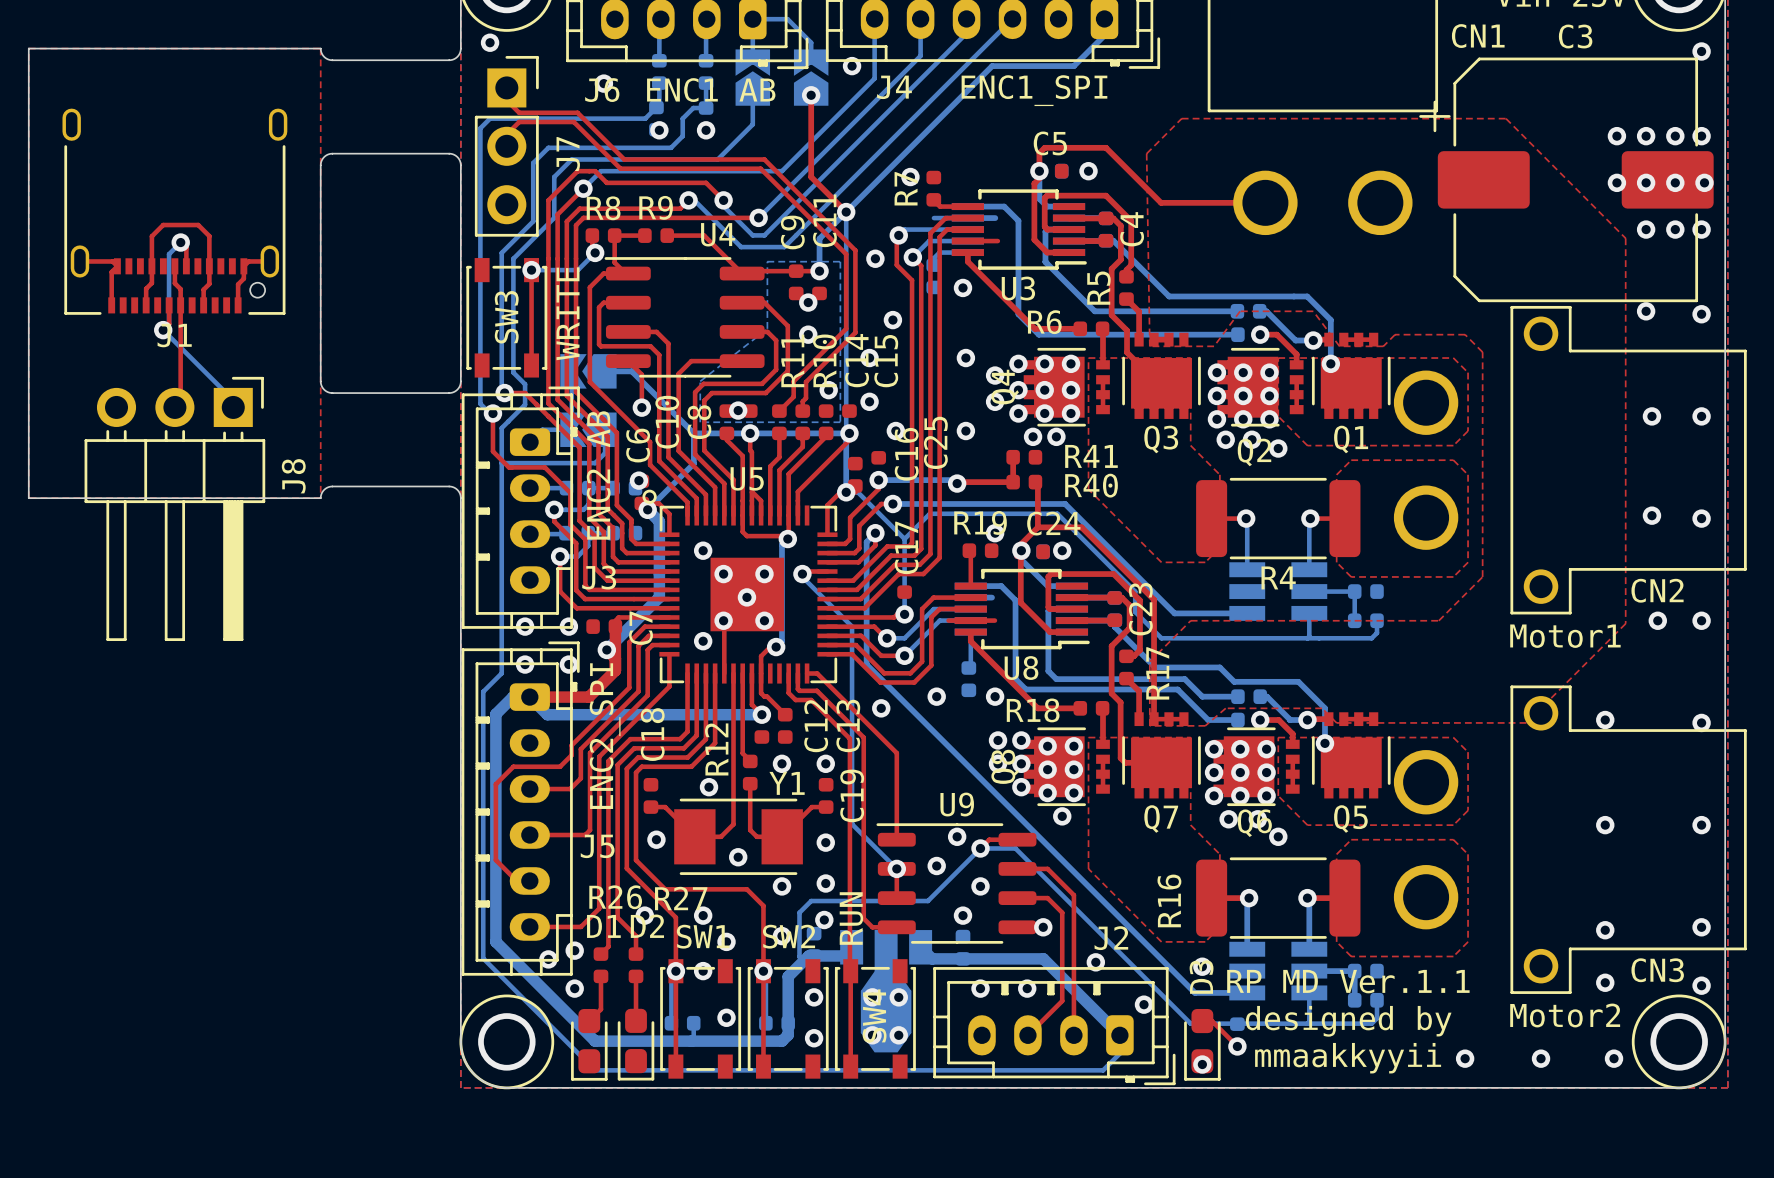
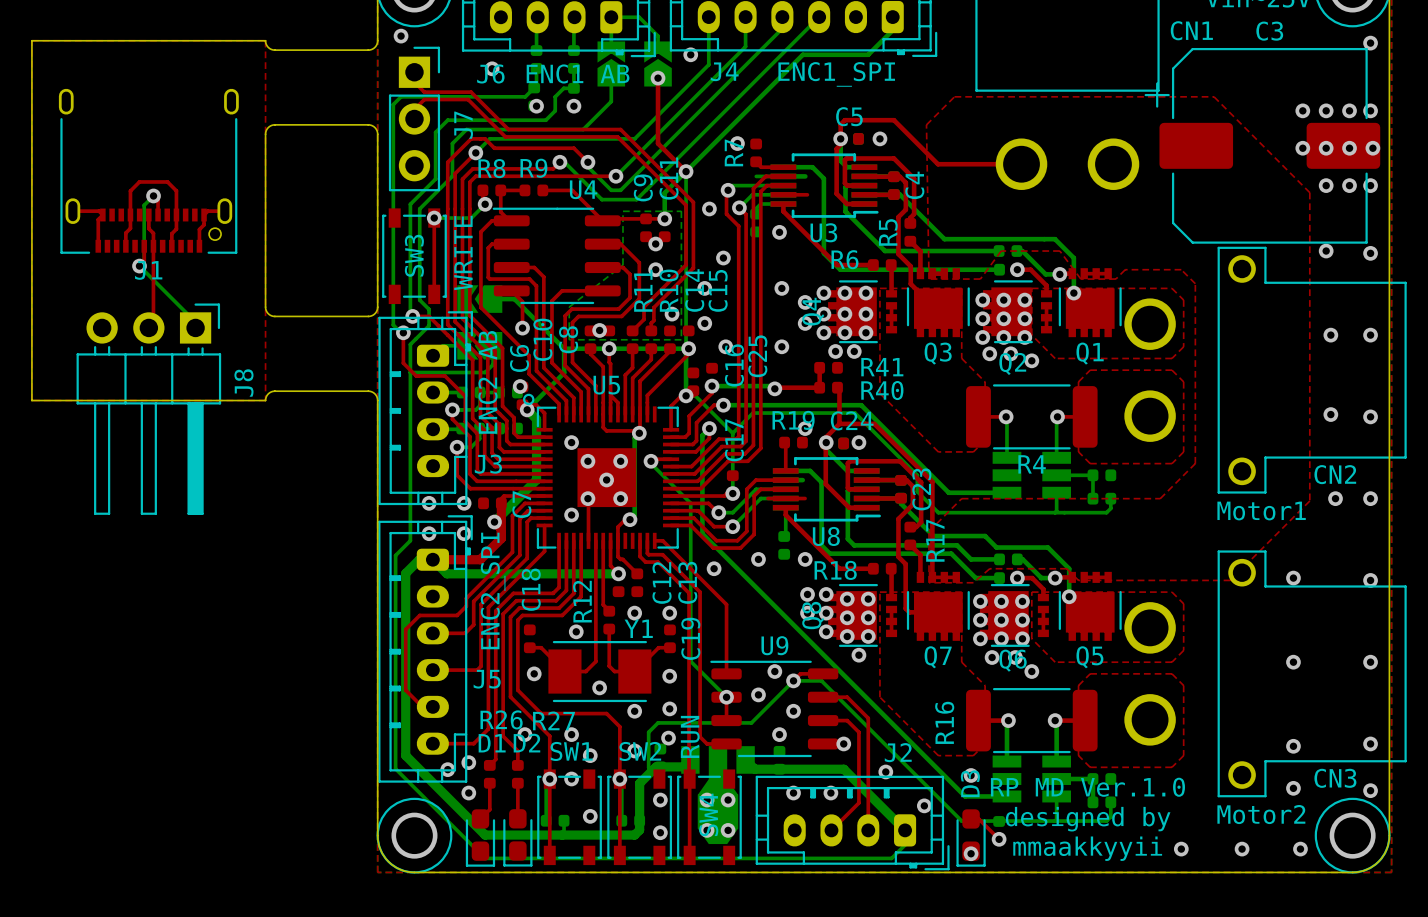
text: RP MD Ver.1.1 (1348, 981) -> RP MD Ver.1.0 (1087, 787)

